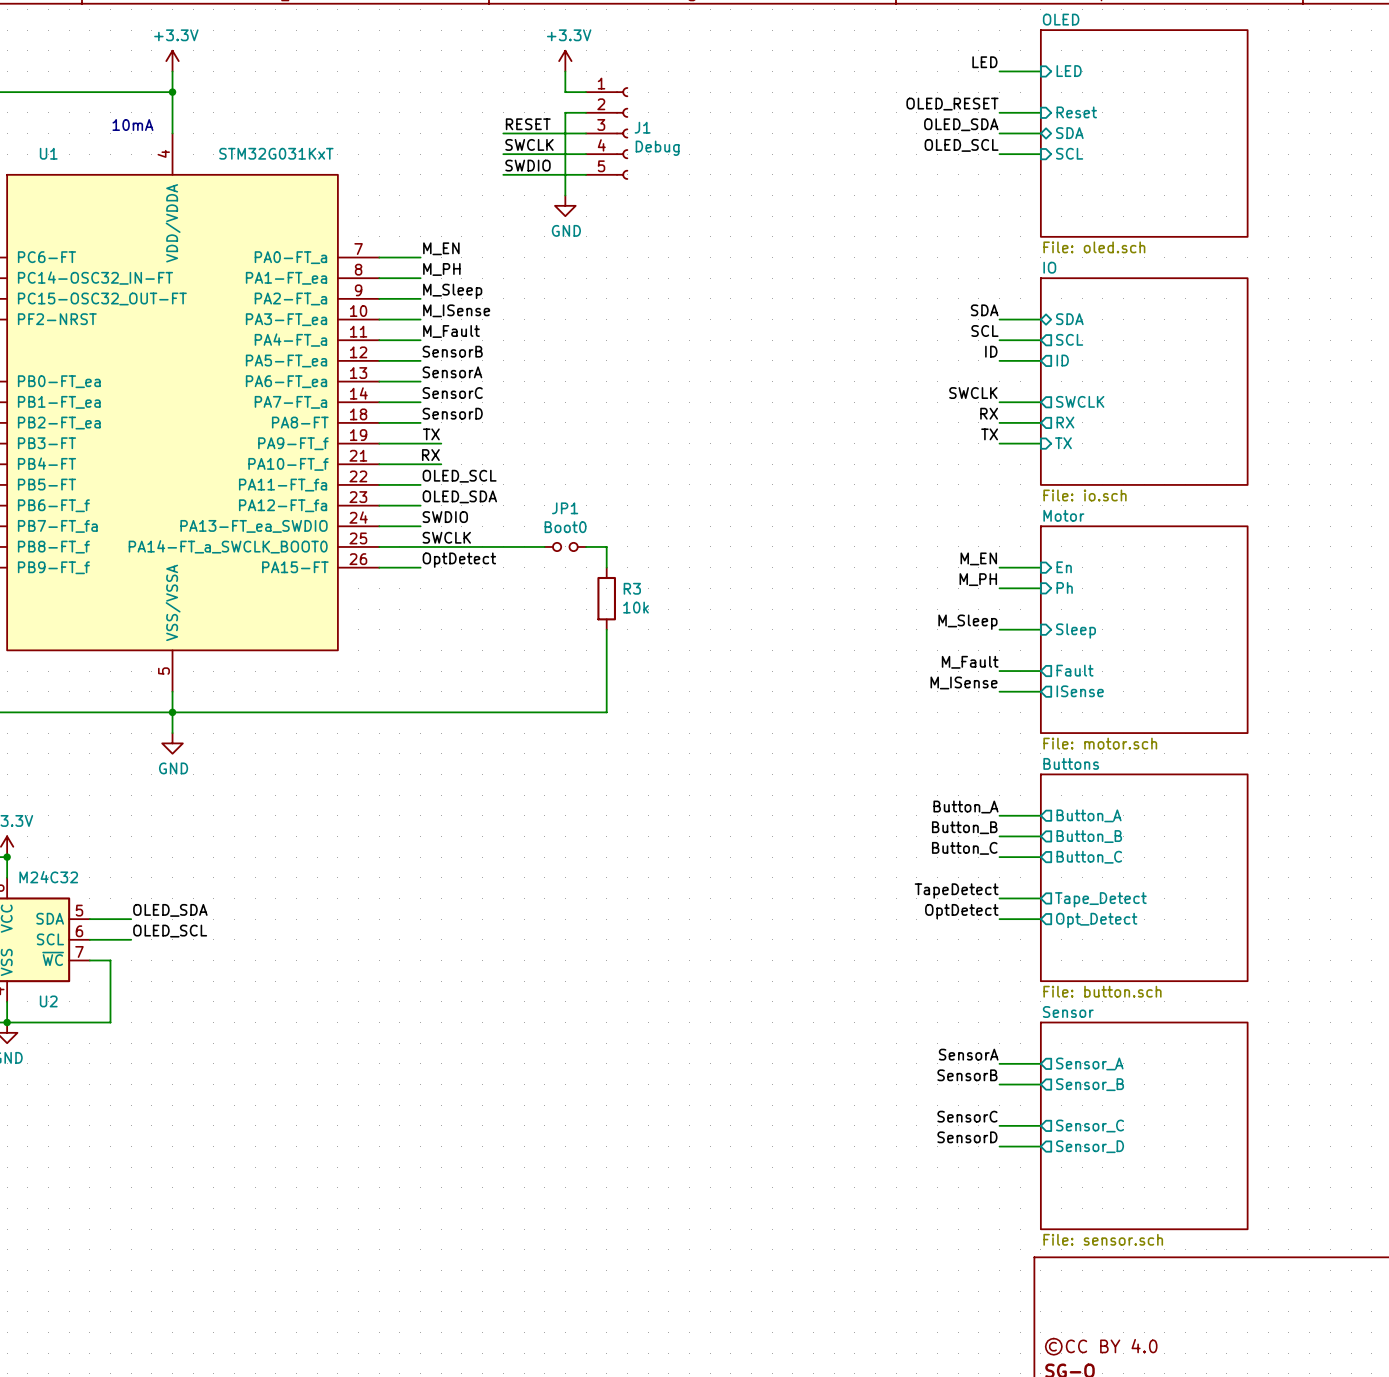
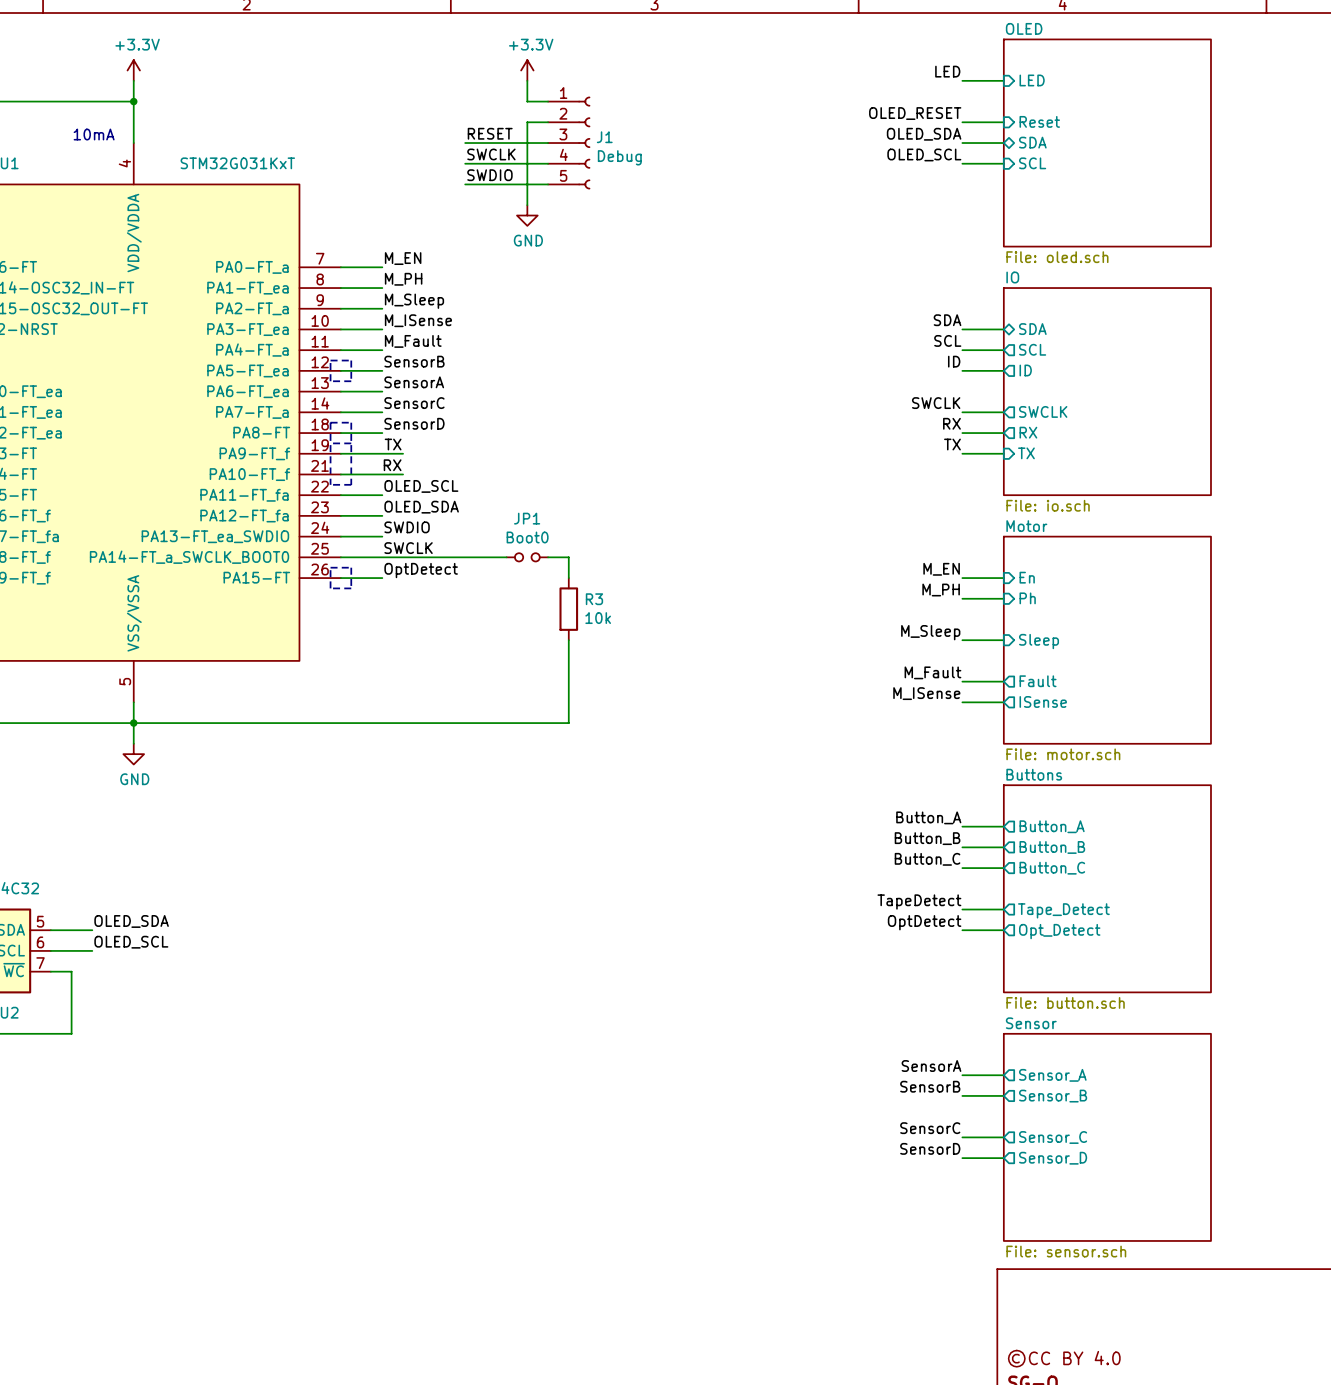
line: none -> (330, 360) (351, 360) (351, 381) (330, 381) (330, 360)
line: none -> (330, 422) (330, 484) (351, 484) (351, 422) (330, 422)
line: none -> (330, 443) (351, 443)
line: none -> (330, 567) (330, 588) (351, 588) (351, 567) (330, 567)

